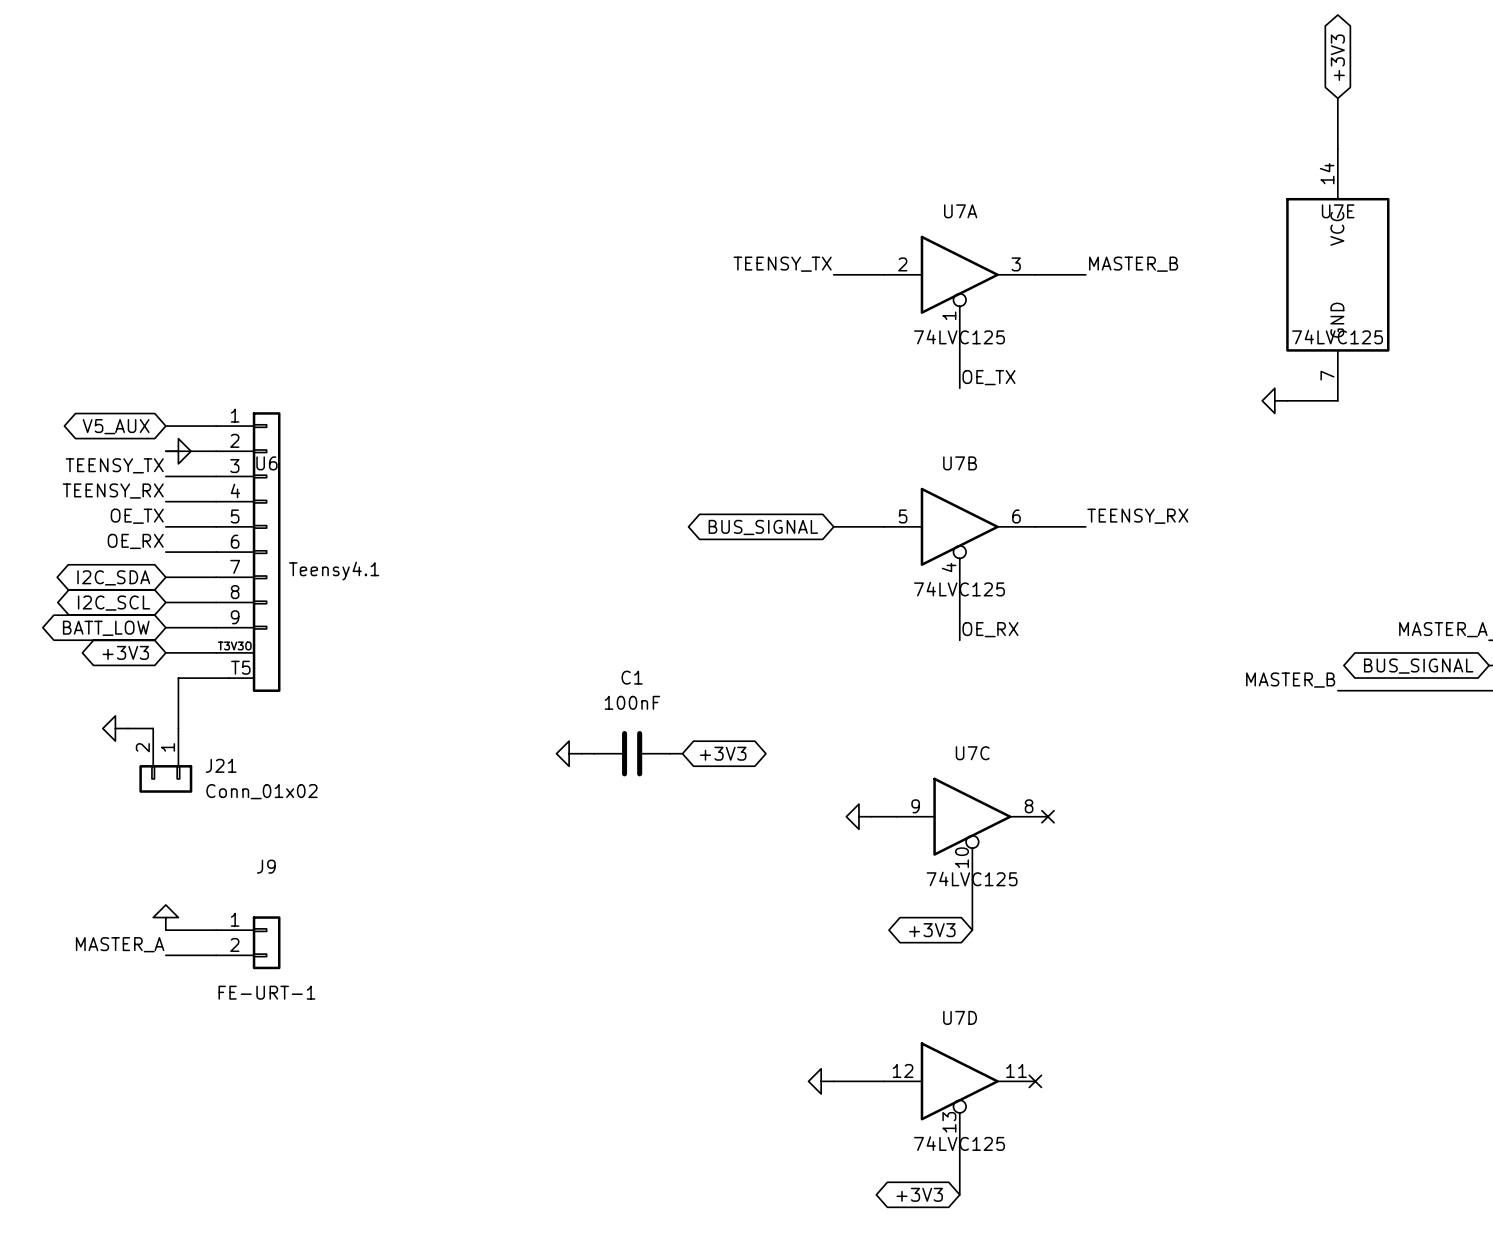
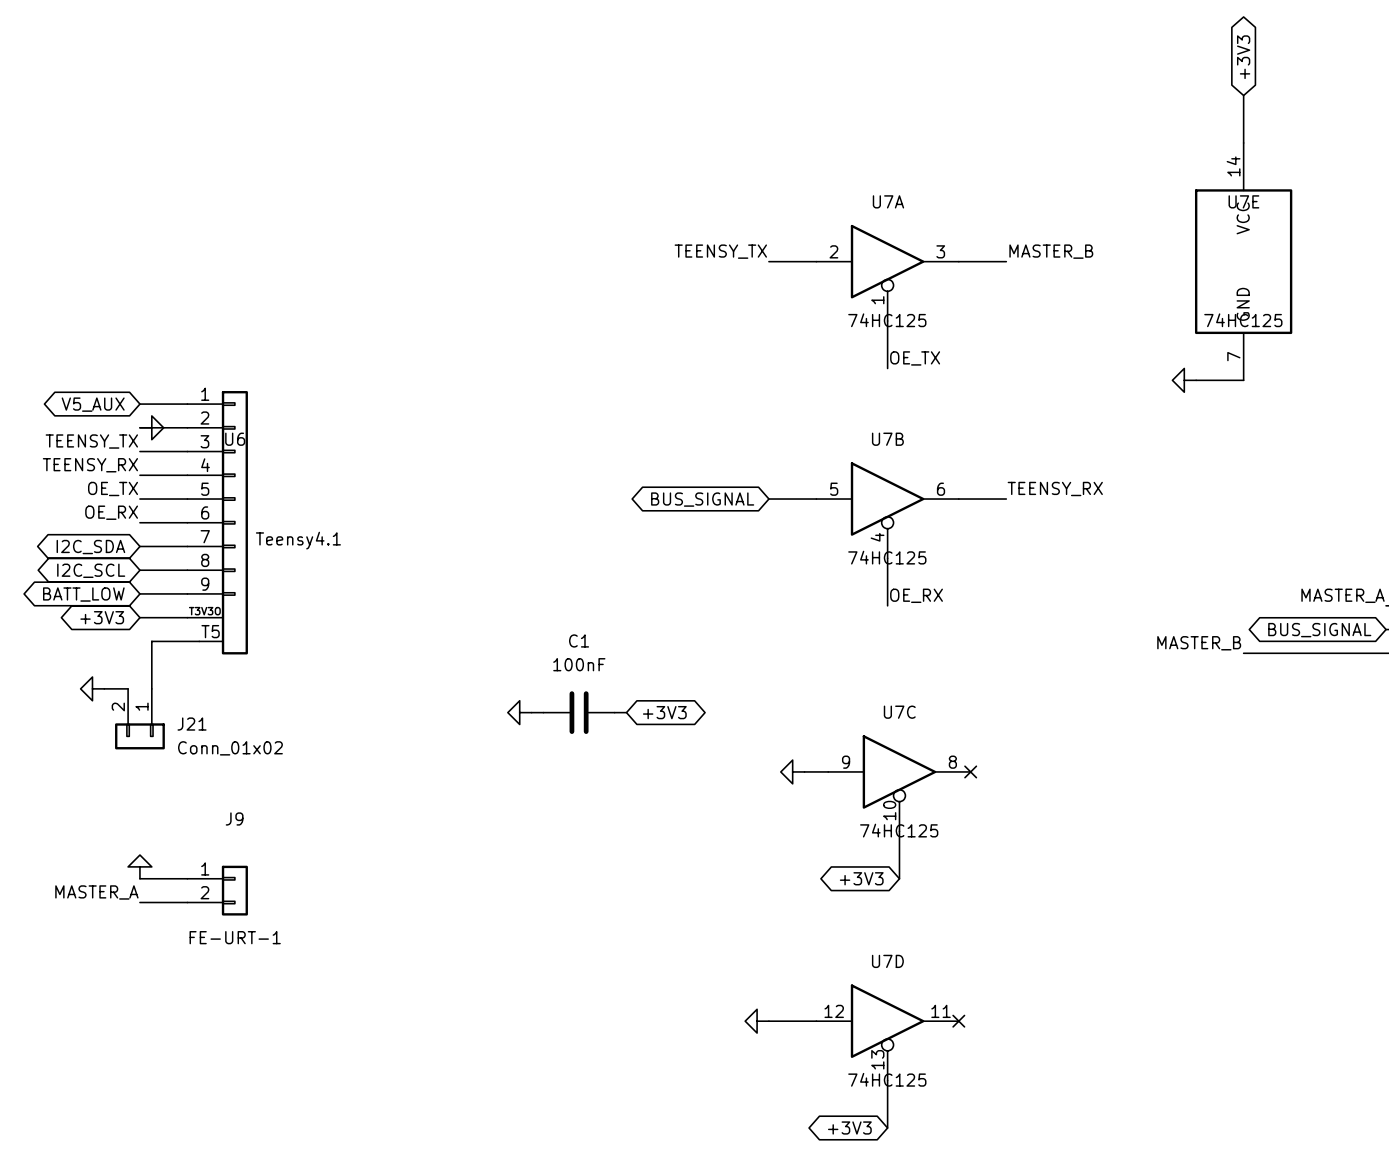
U7A value: 74LVC125 (959, 337) -> 74HC125 (887, 320)
U7E value: 74LVC125 (1337, 337) -> 74HC125 (1243, 320)
U7B value: 74LVC125 (959, 589) -> 74HC125 (887, 557)
U7C value: 74LVC125 (972, 878) -> 74HC125 (899, 830)
U7D value: 74LVC125 (959, 1143) -> 74HC125 (887, 1079)

